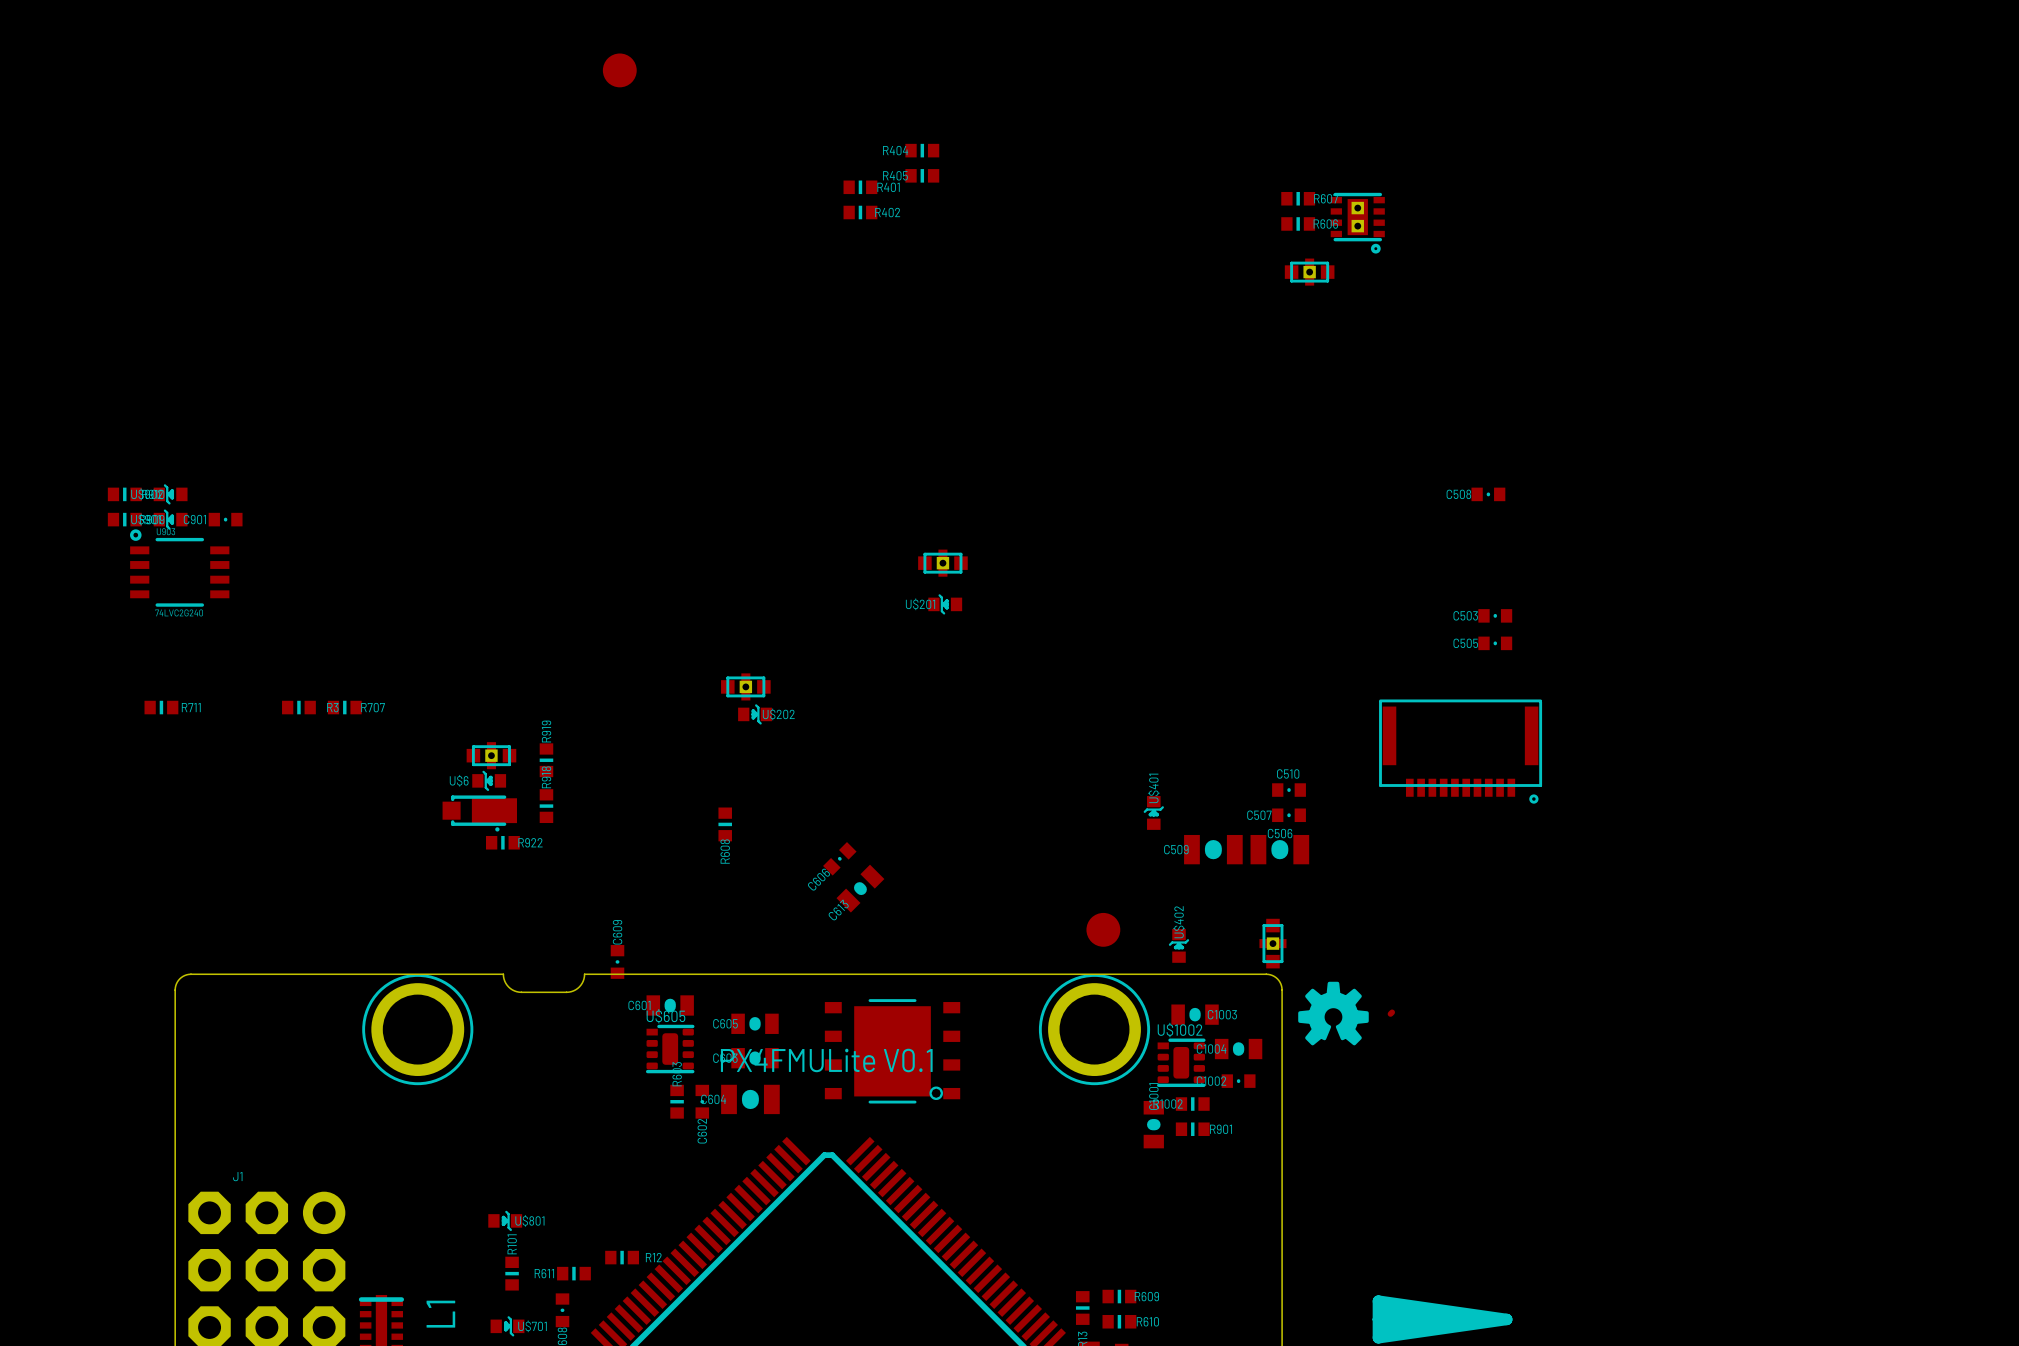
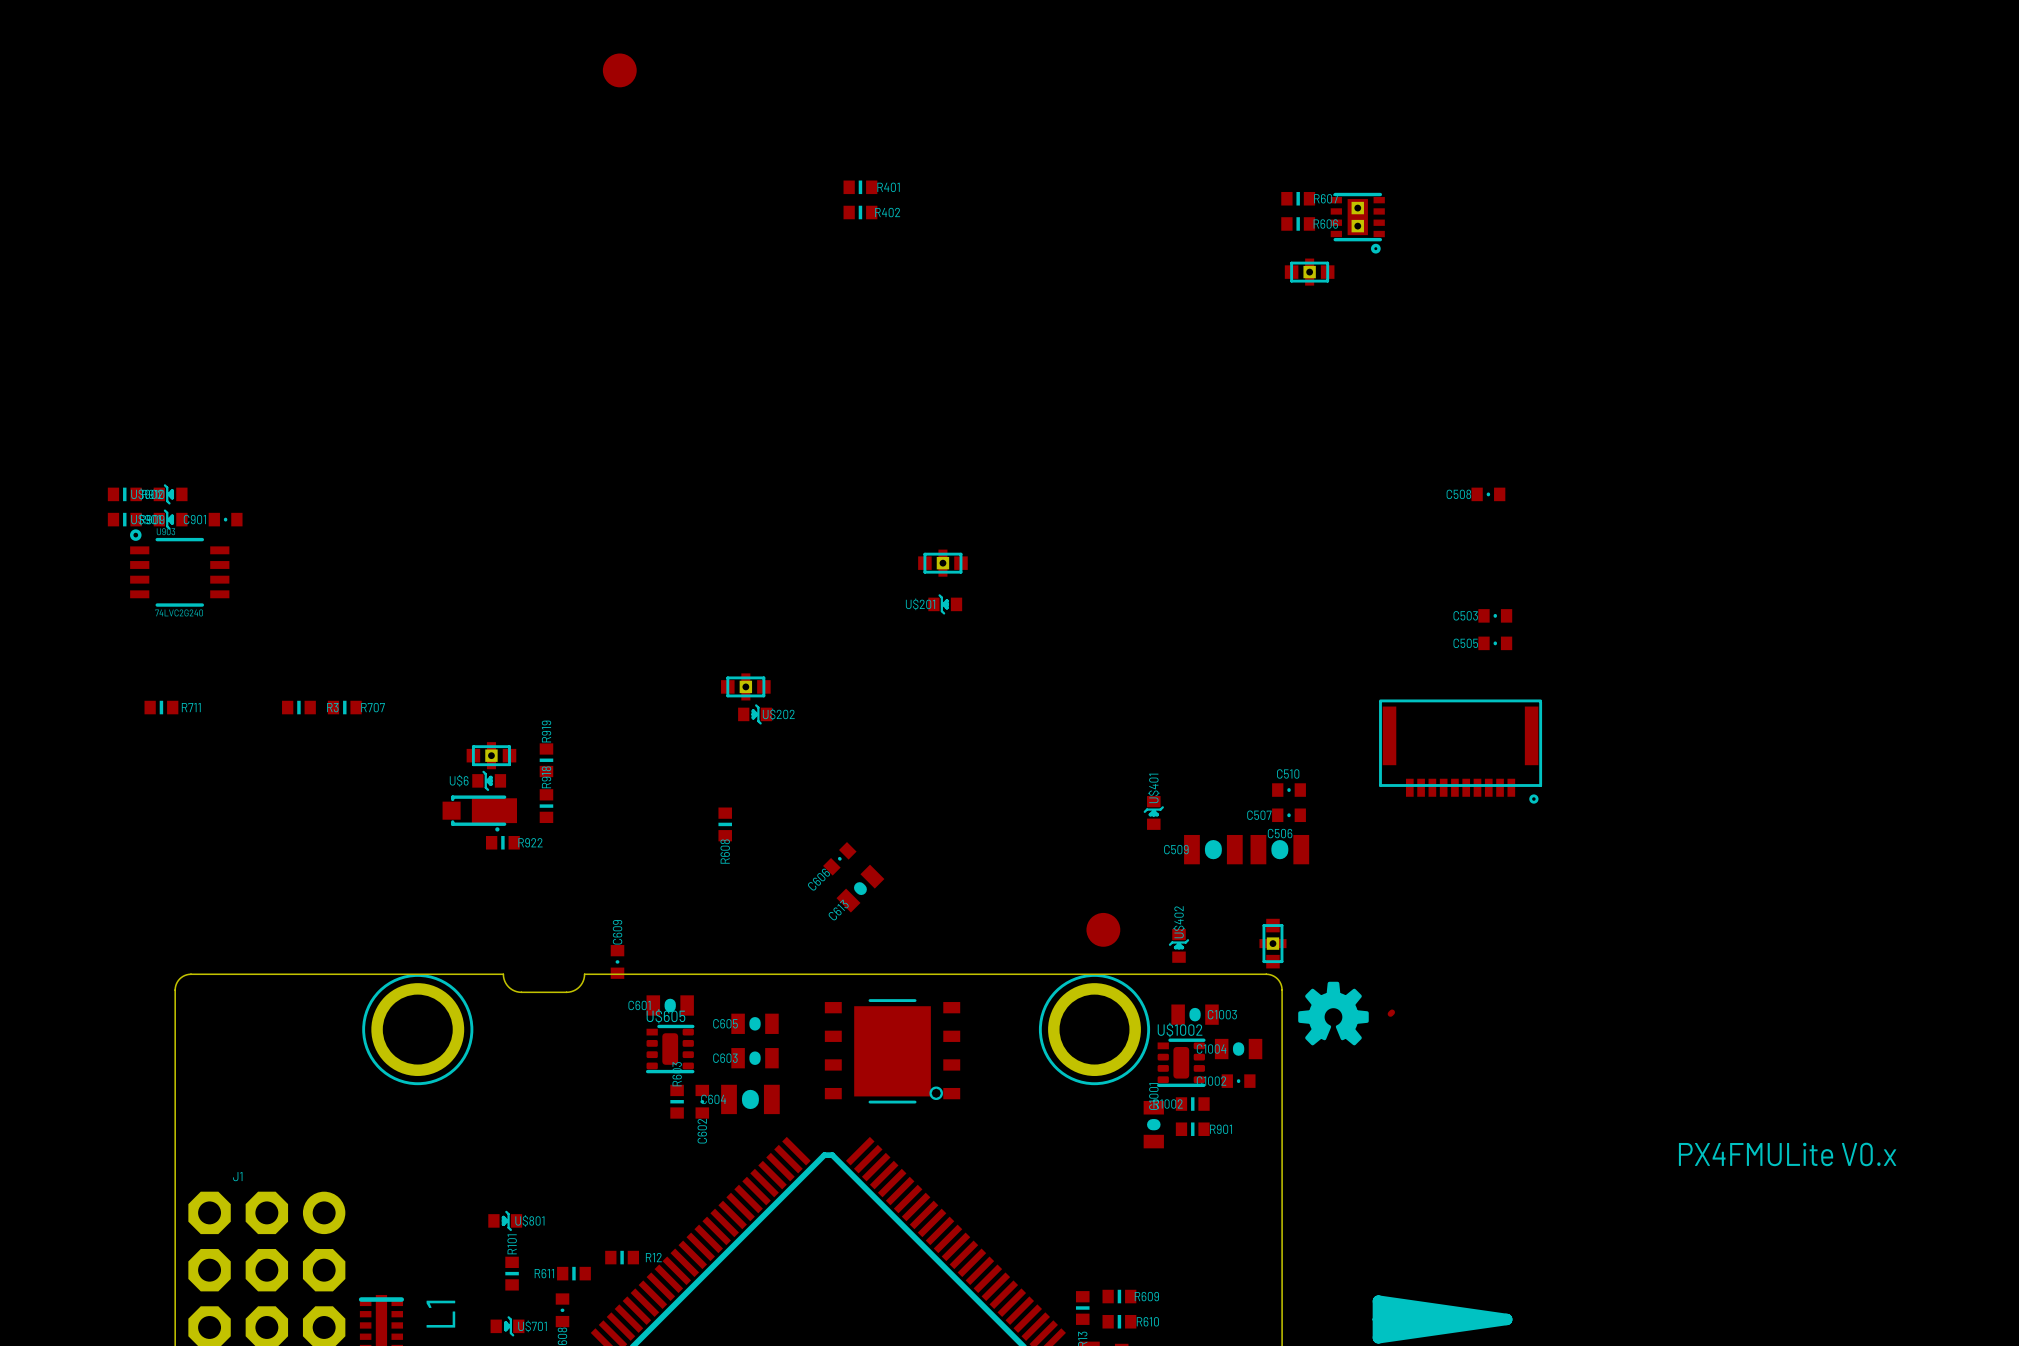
R404: (922, 150) -> none
R405: (922, 175) -> none
text: PX4FMULite V0.1 (826, 1060) -> none
text: none -> PX4FMULite V0.x (1787, 1154)

